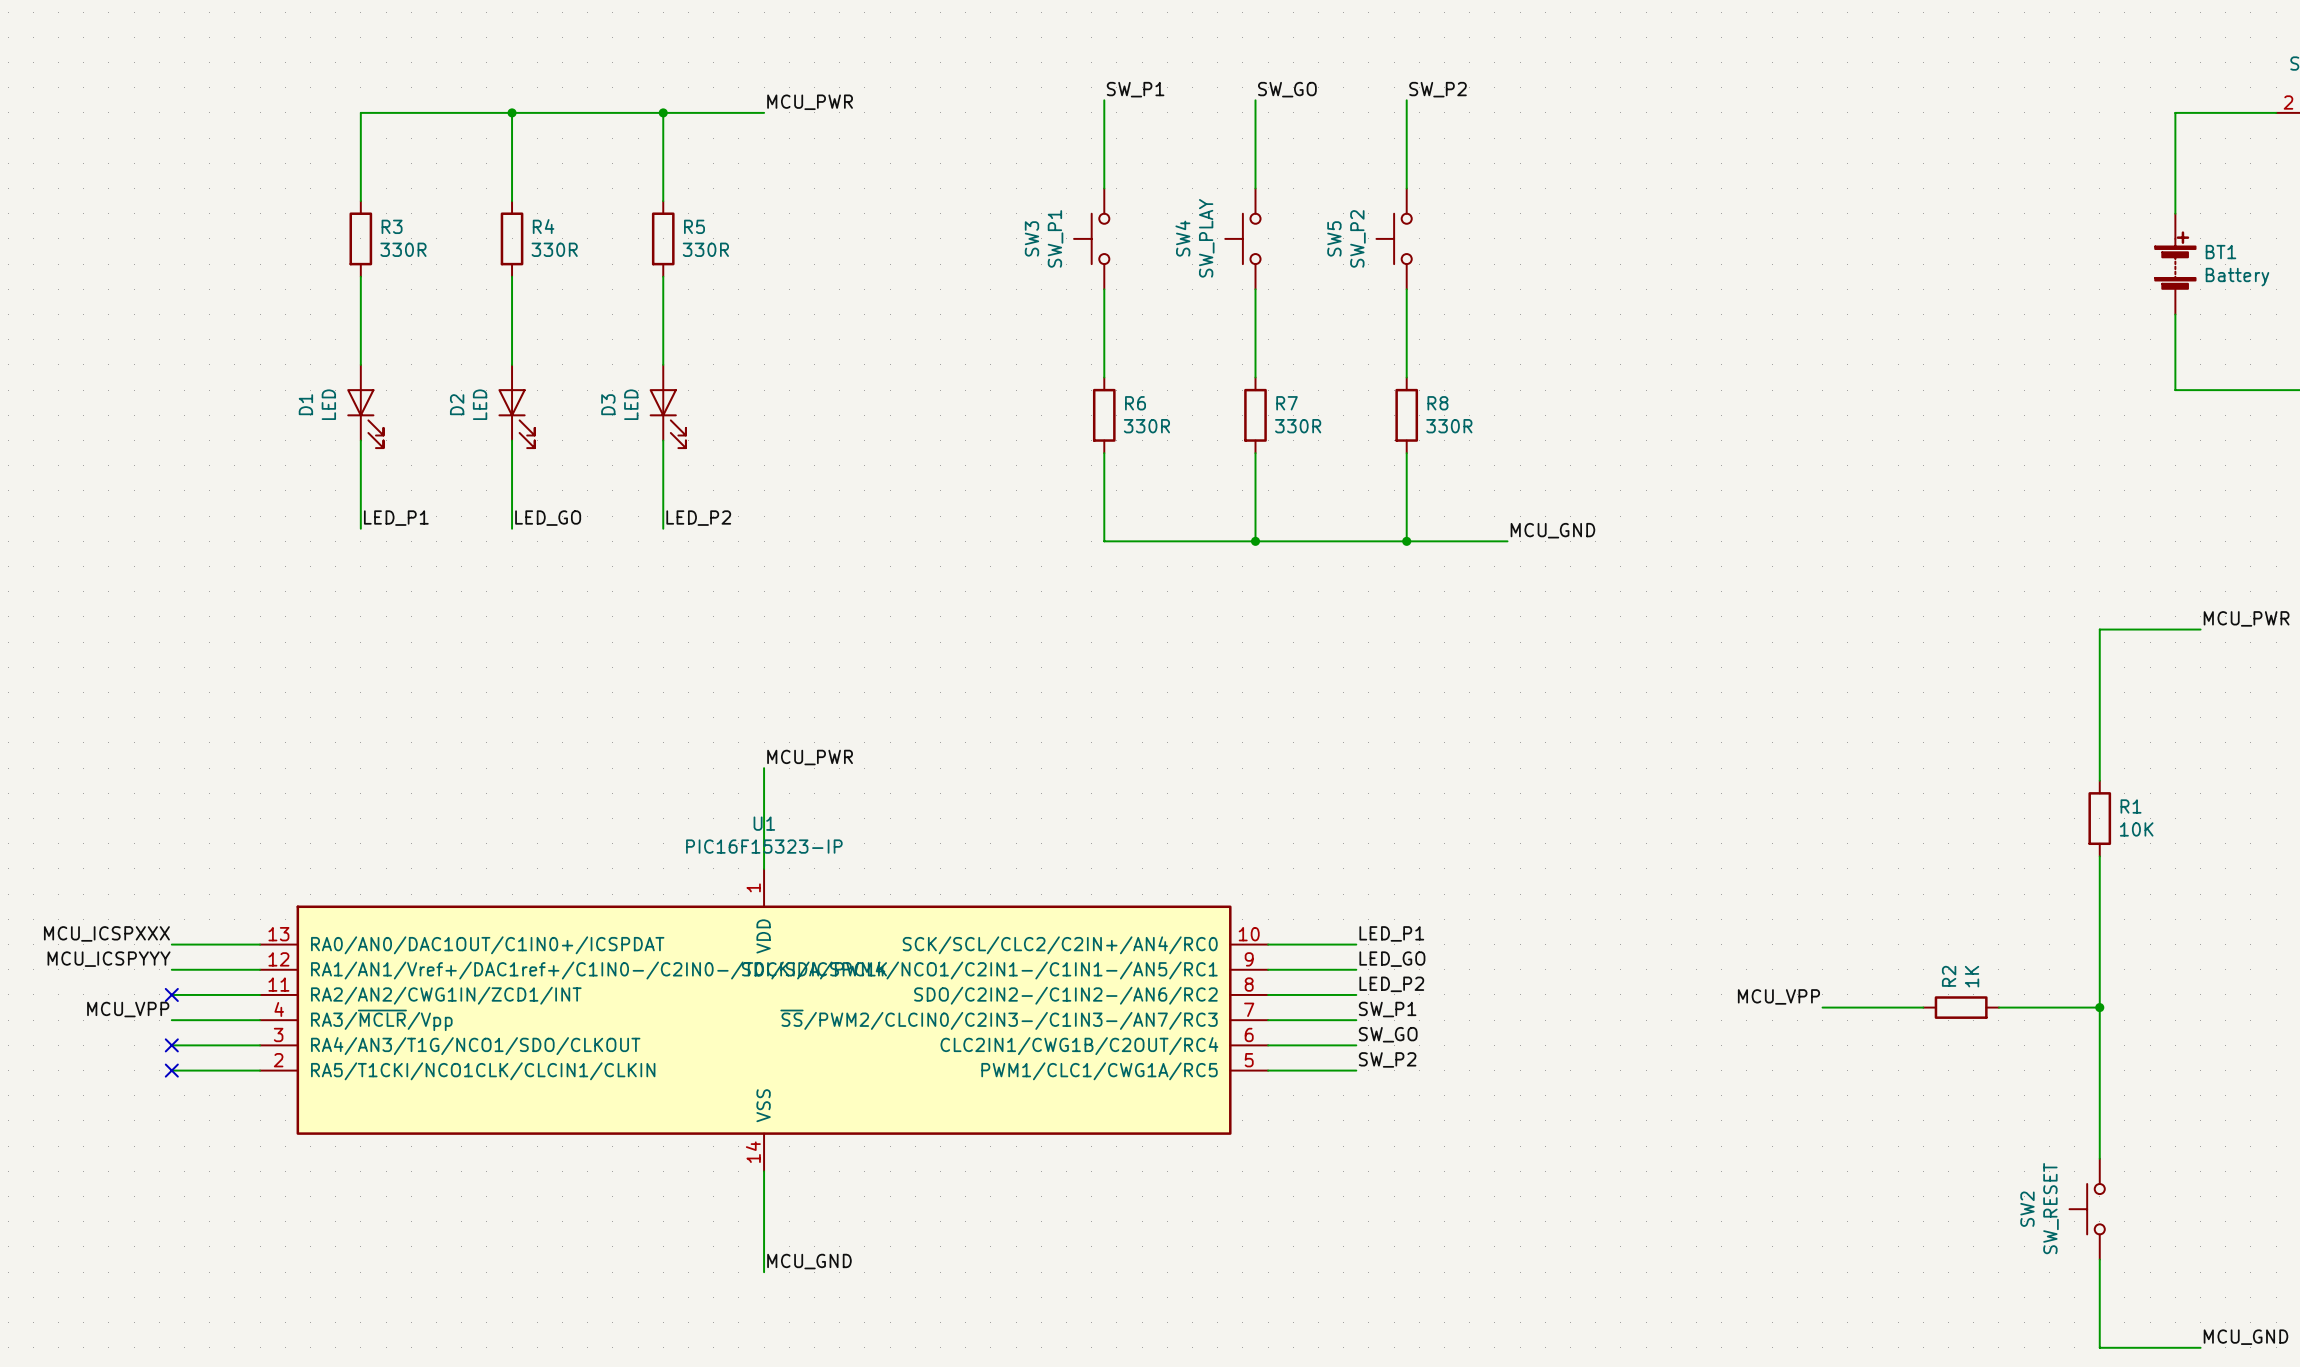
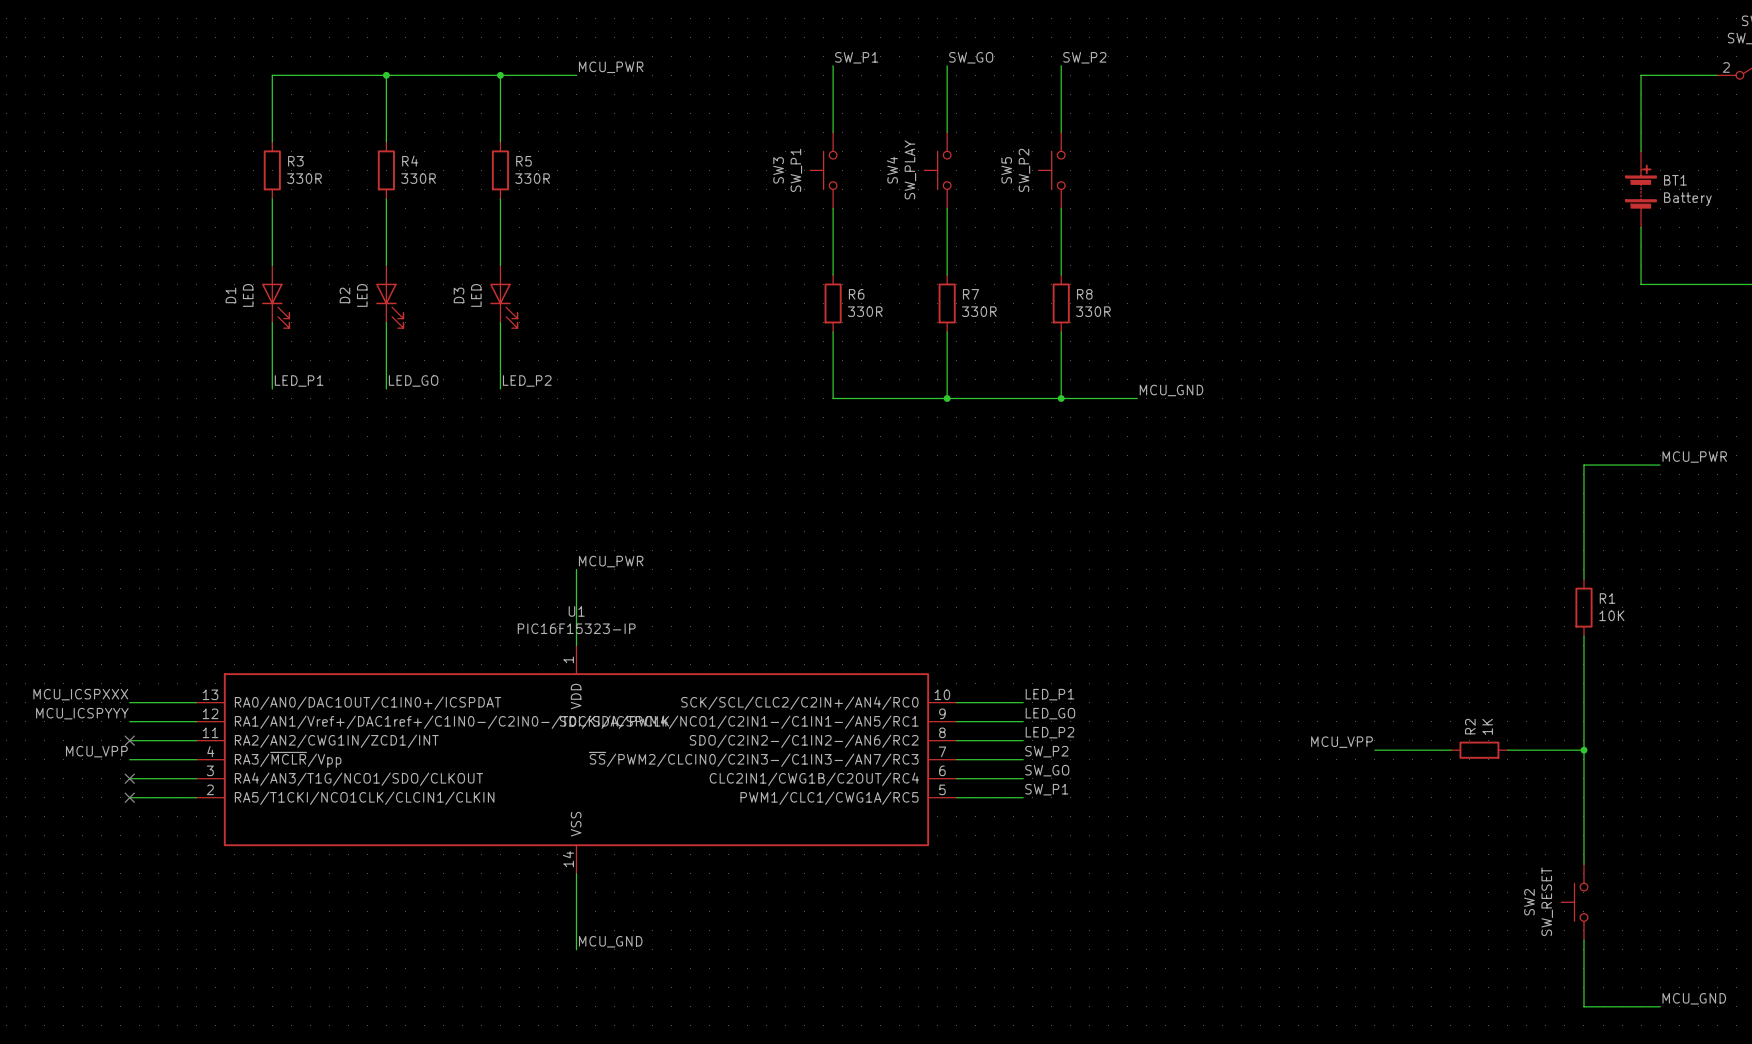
label: SW_P1 (1387, 1009) -> SW_P2 (1046, 751)
label: SW_P2 (1387, 1059) -> SW_P1 (1046, 789)

